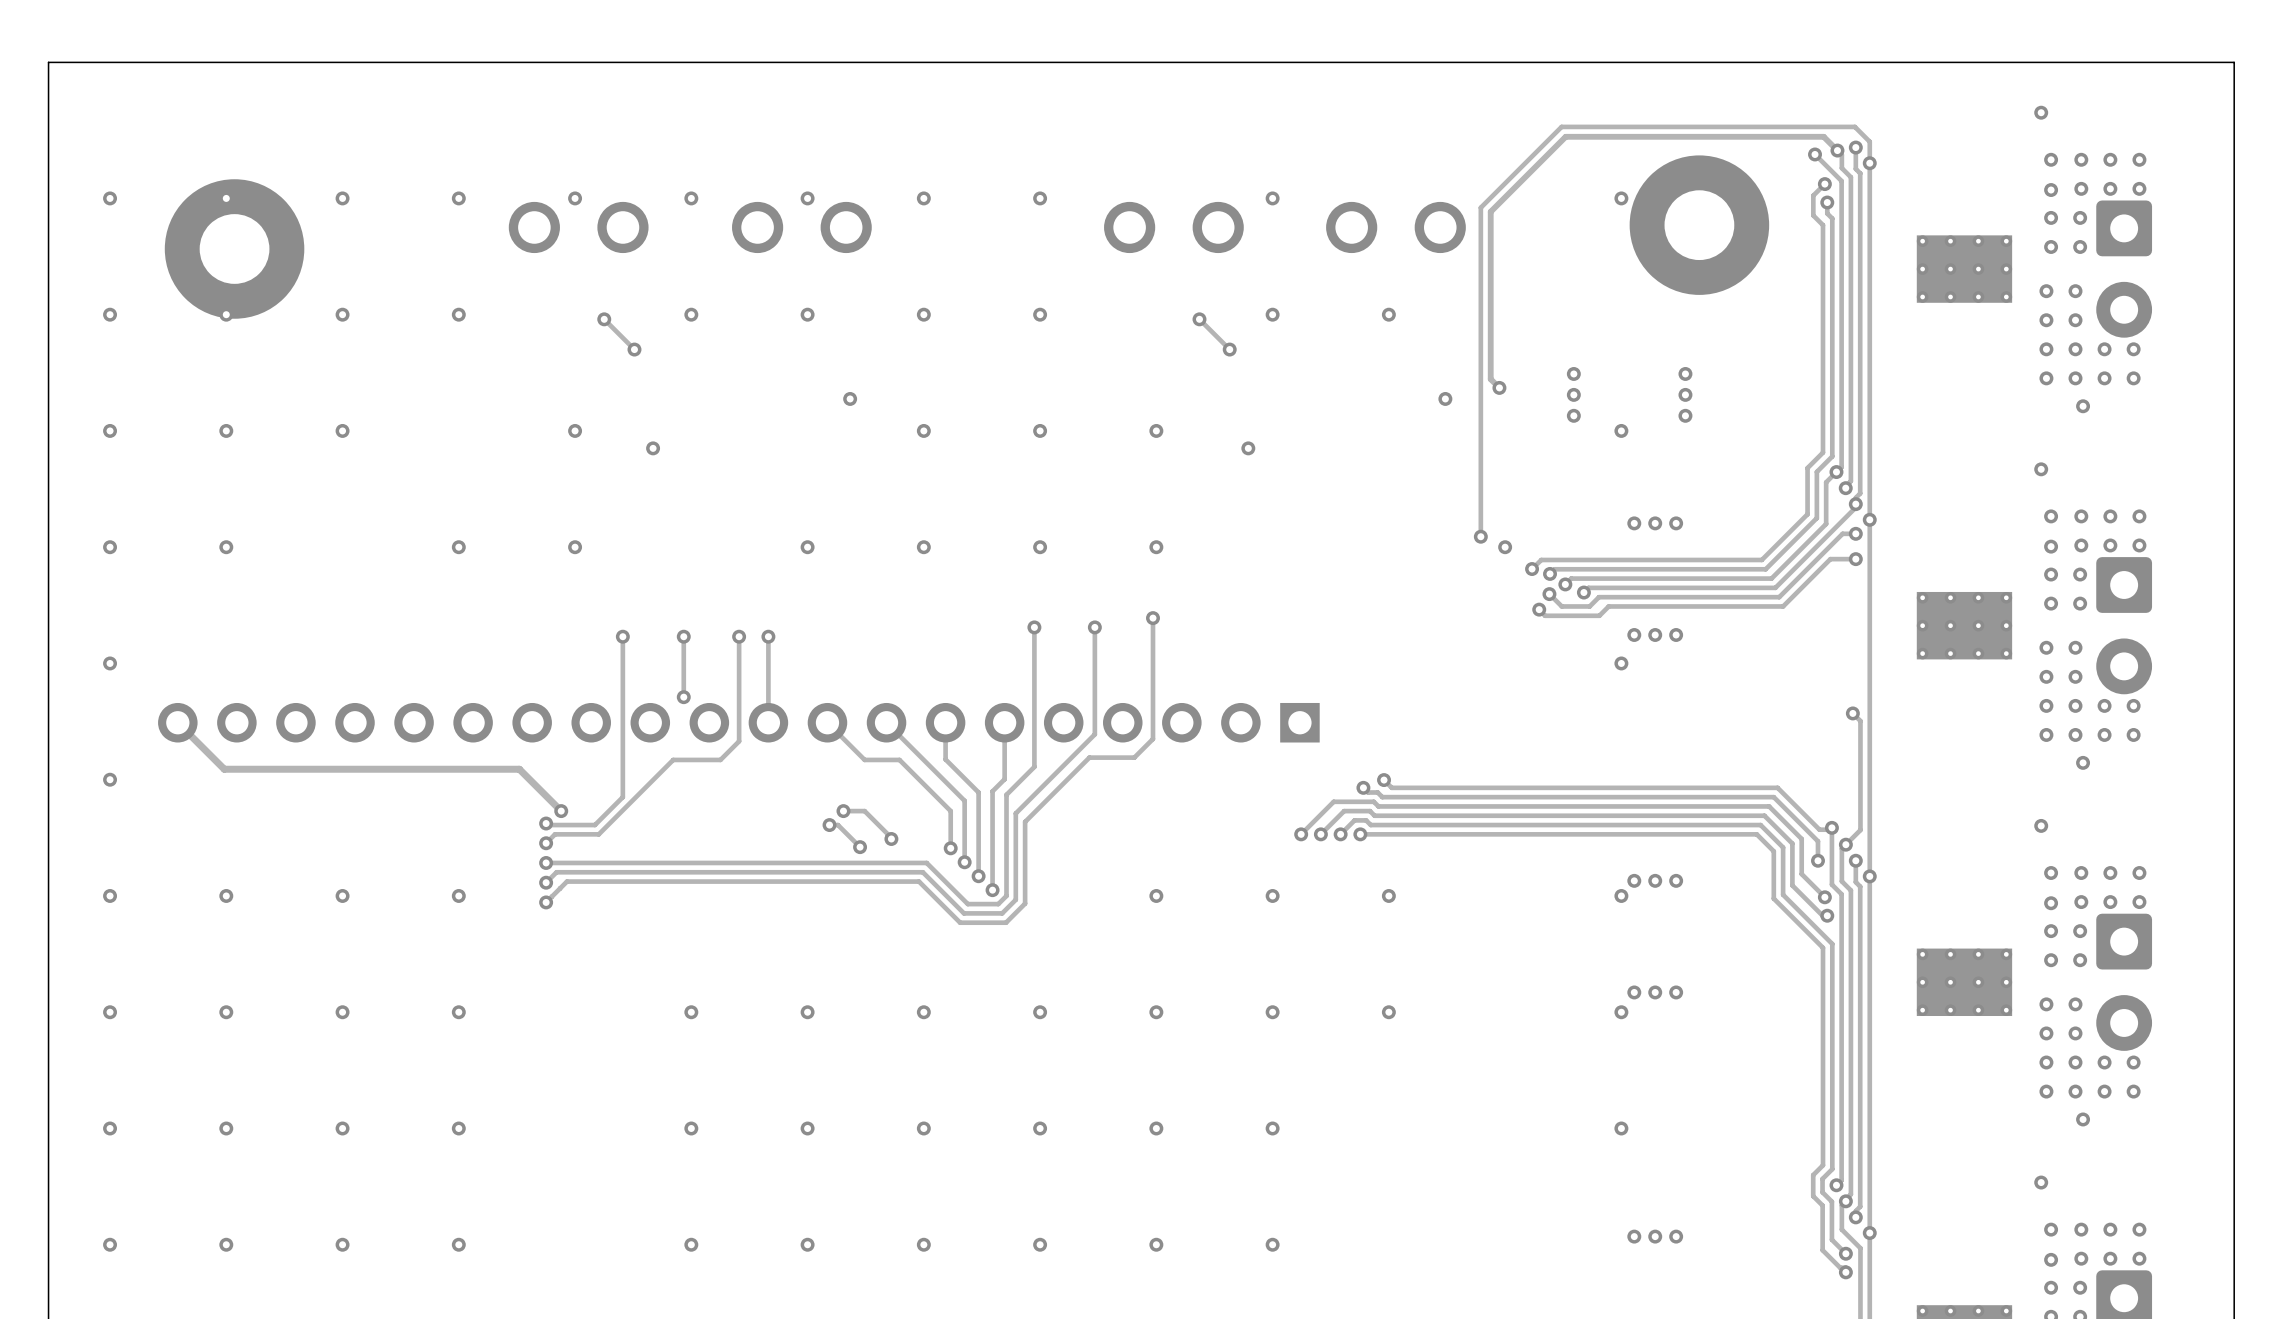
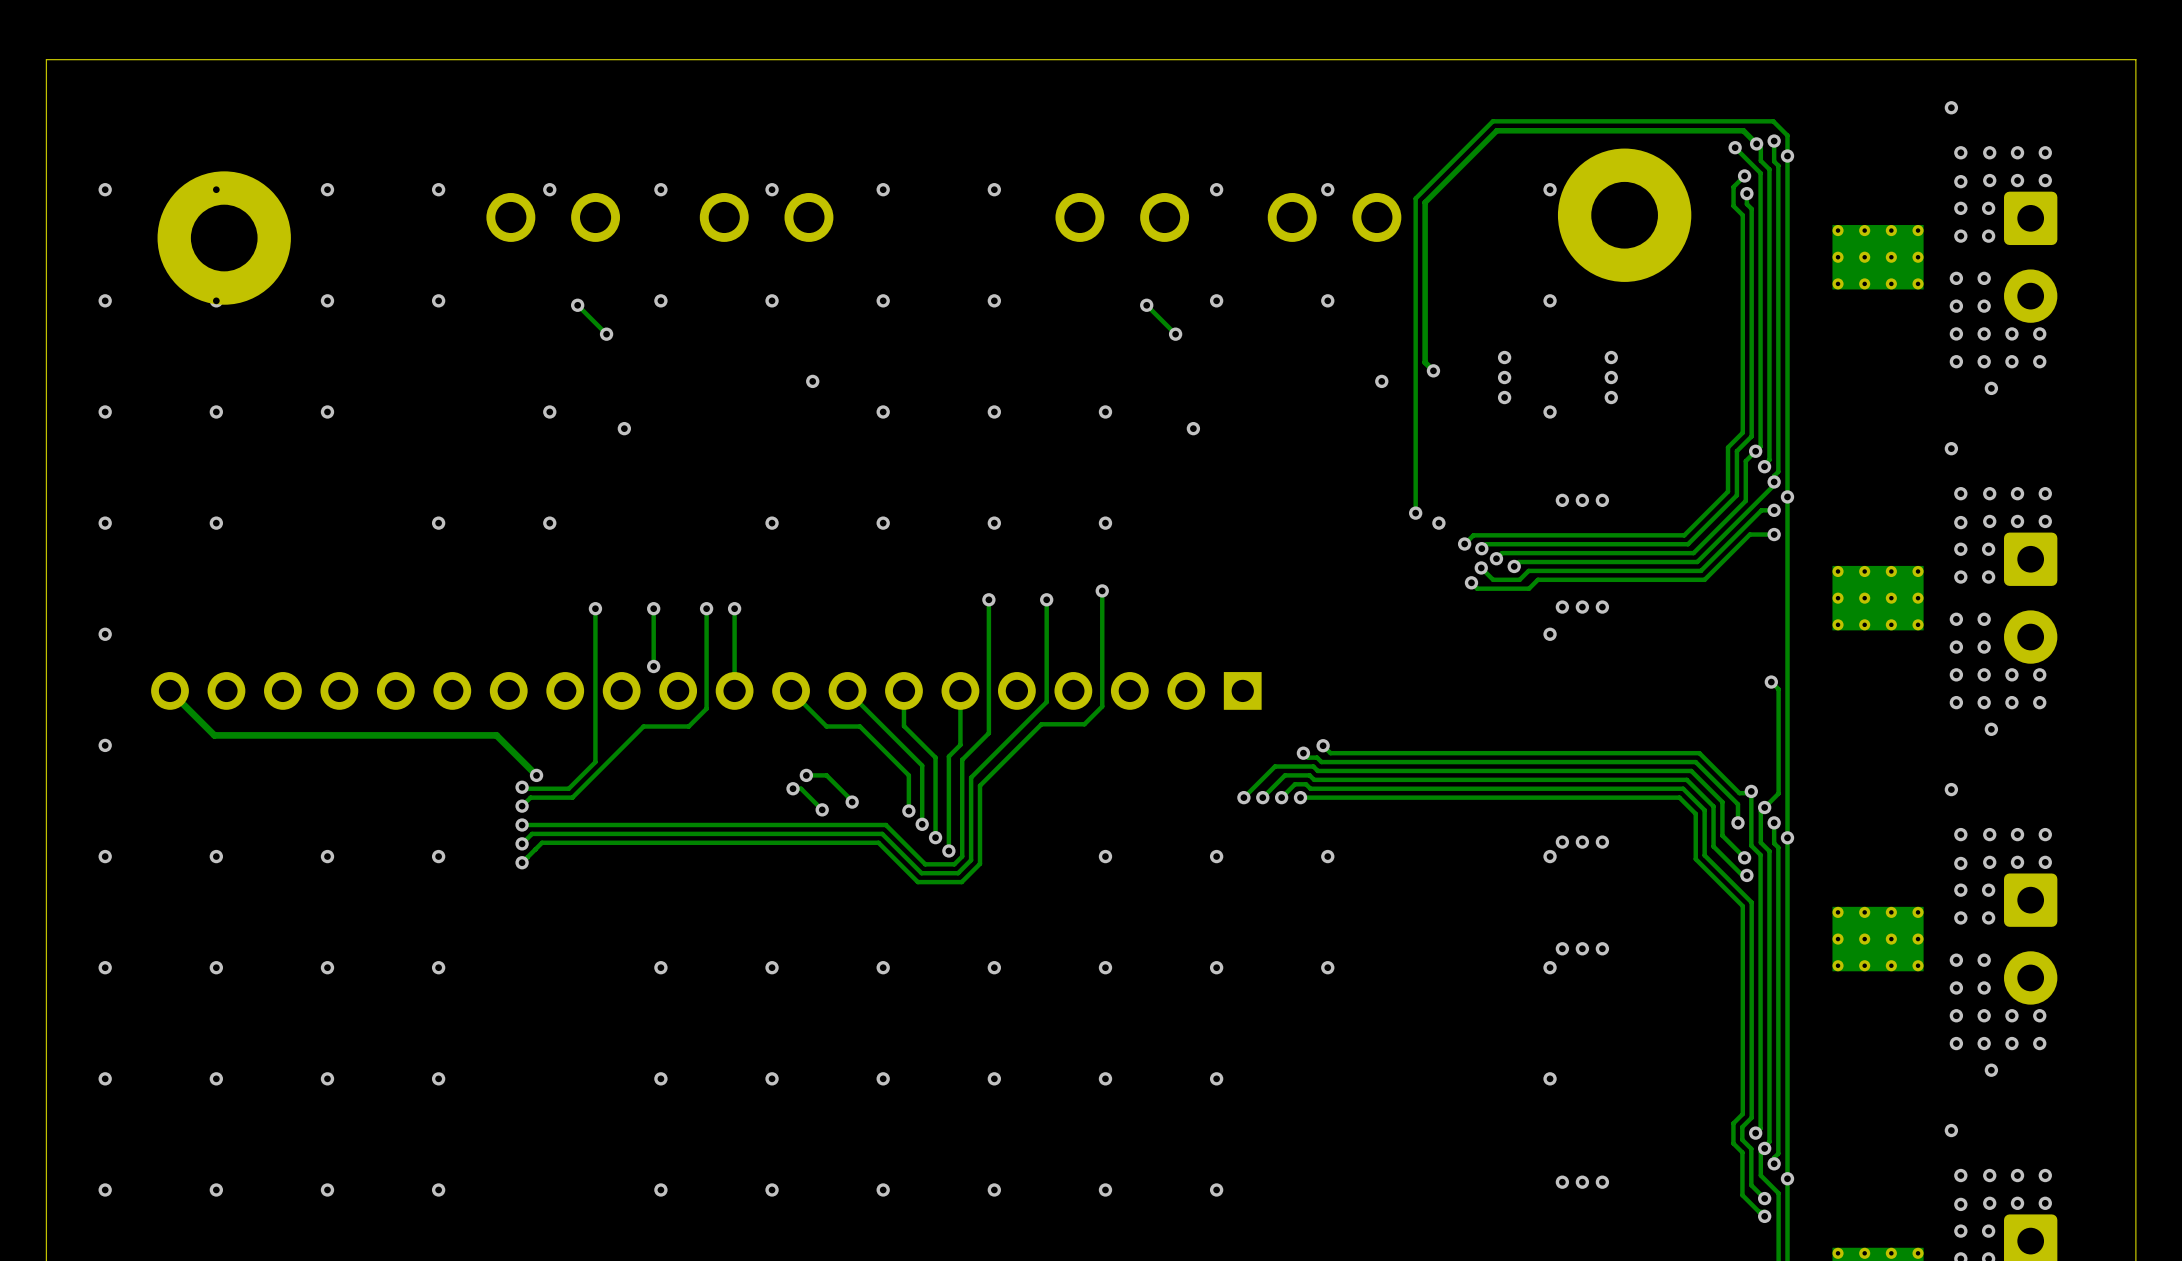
via: none -> (1327, 189)
via: none -> (1550, 300)

